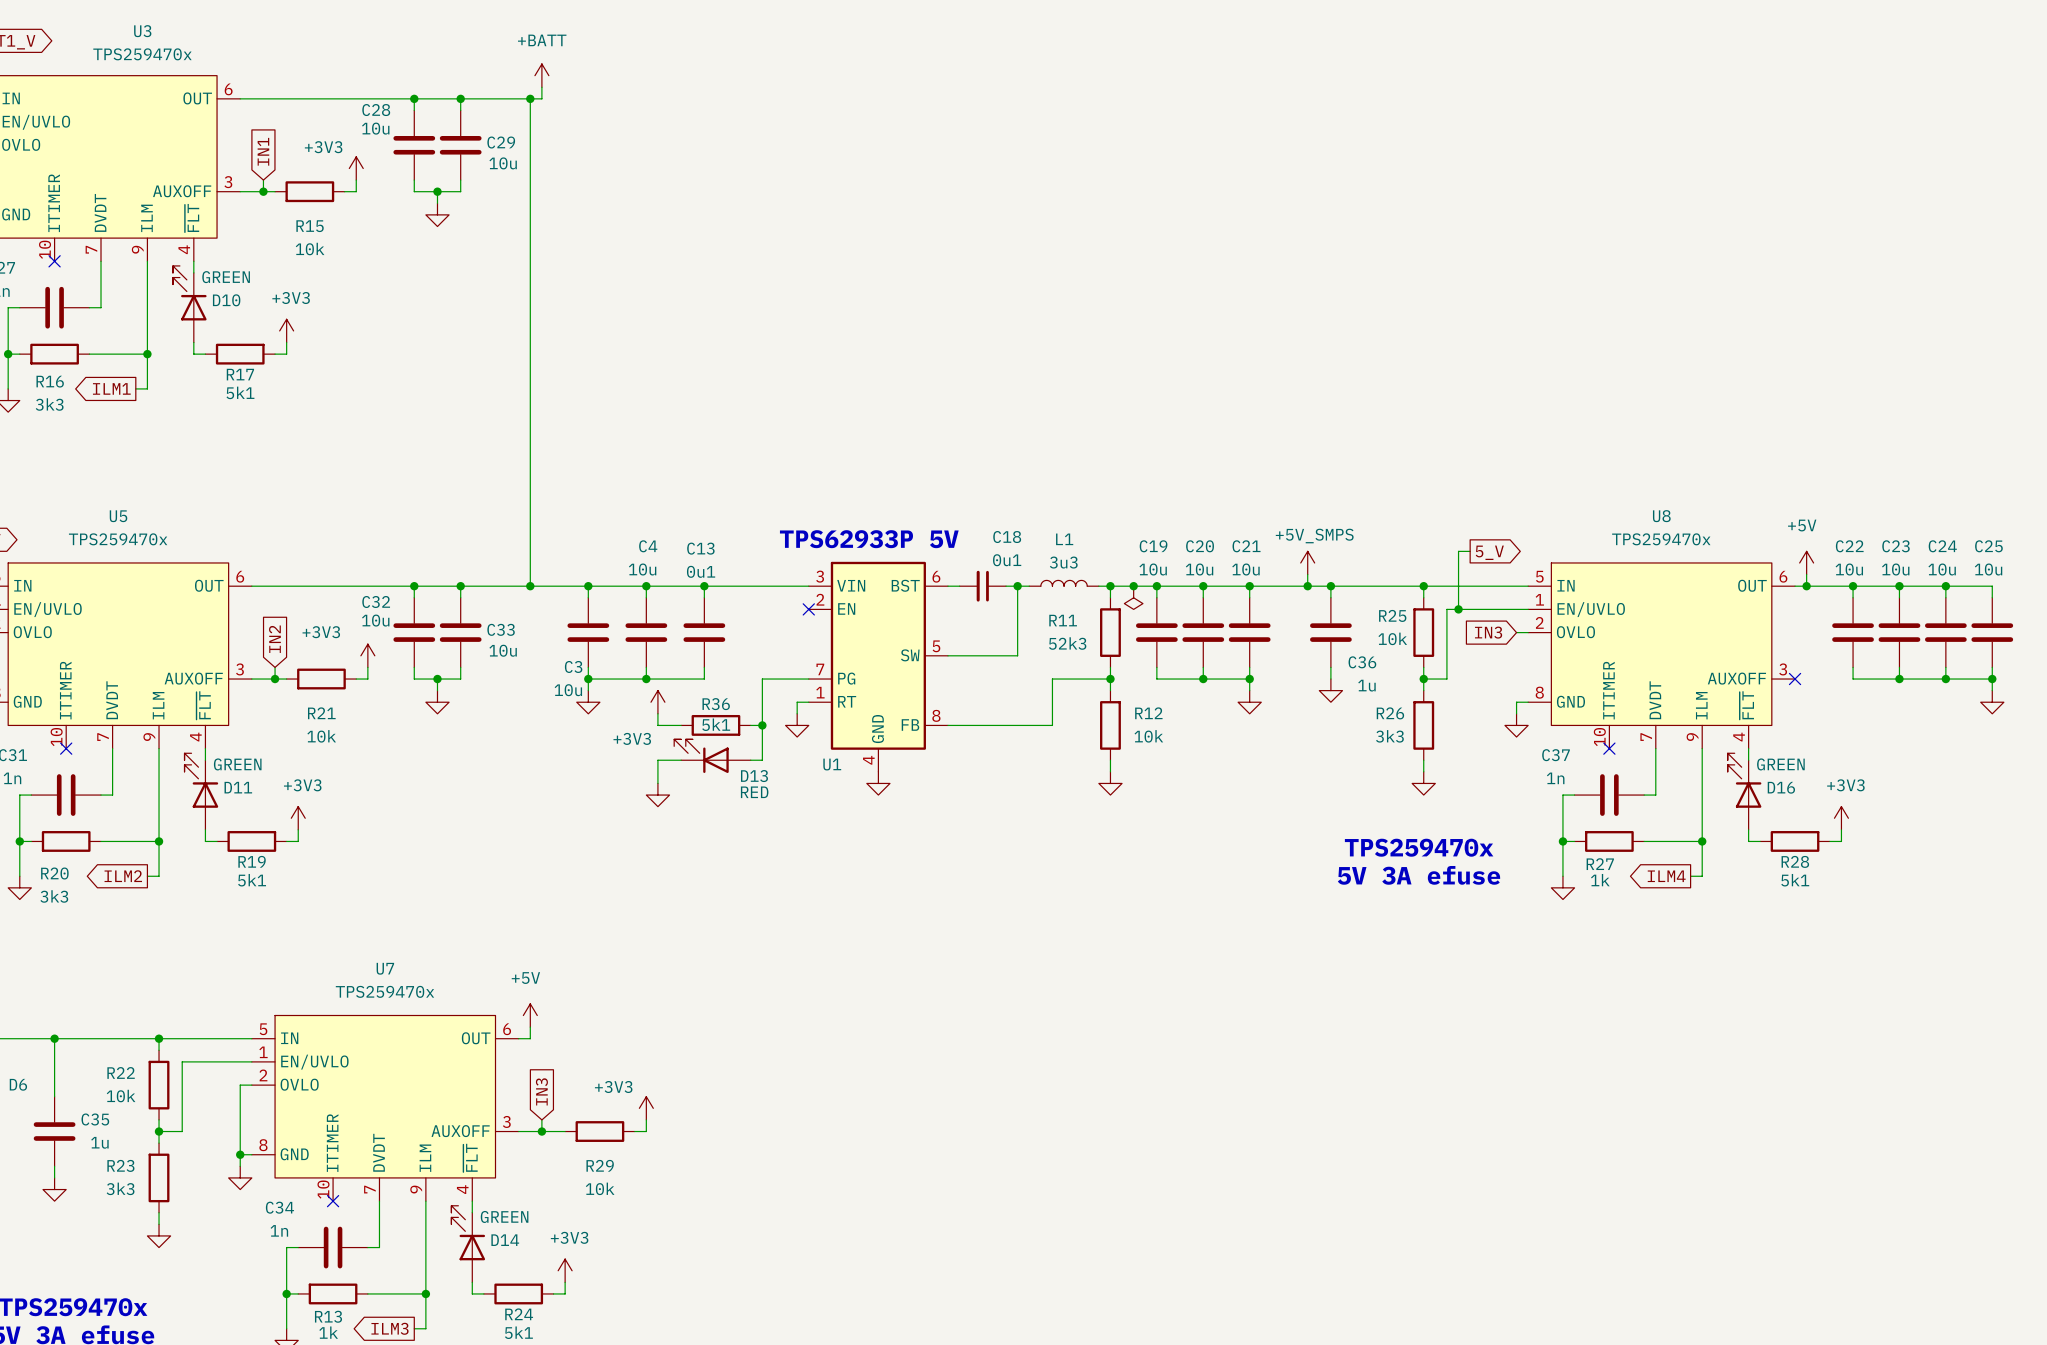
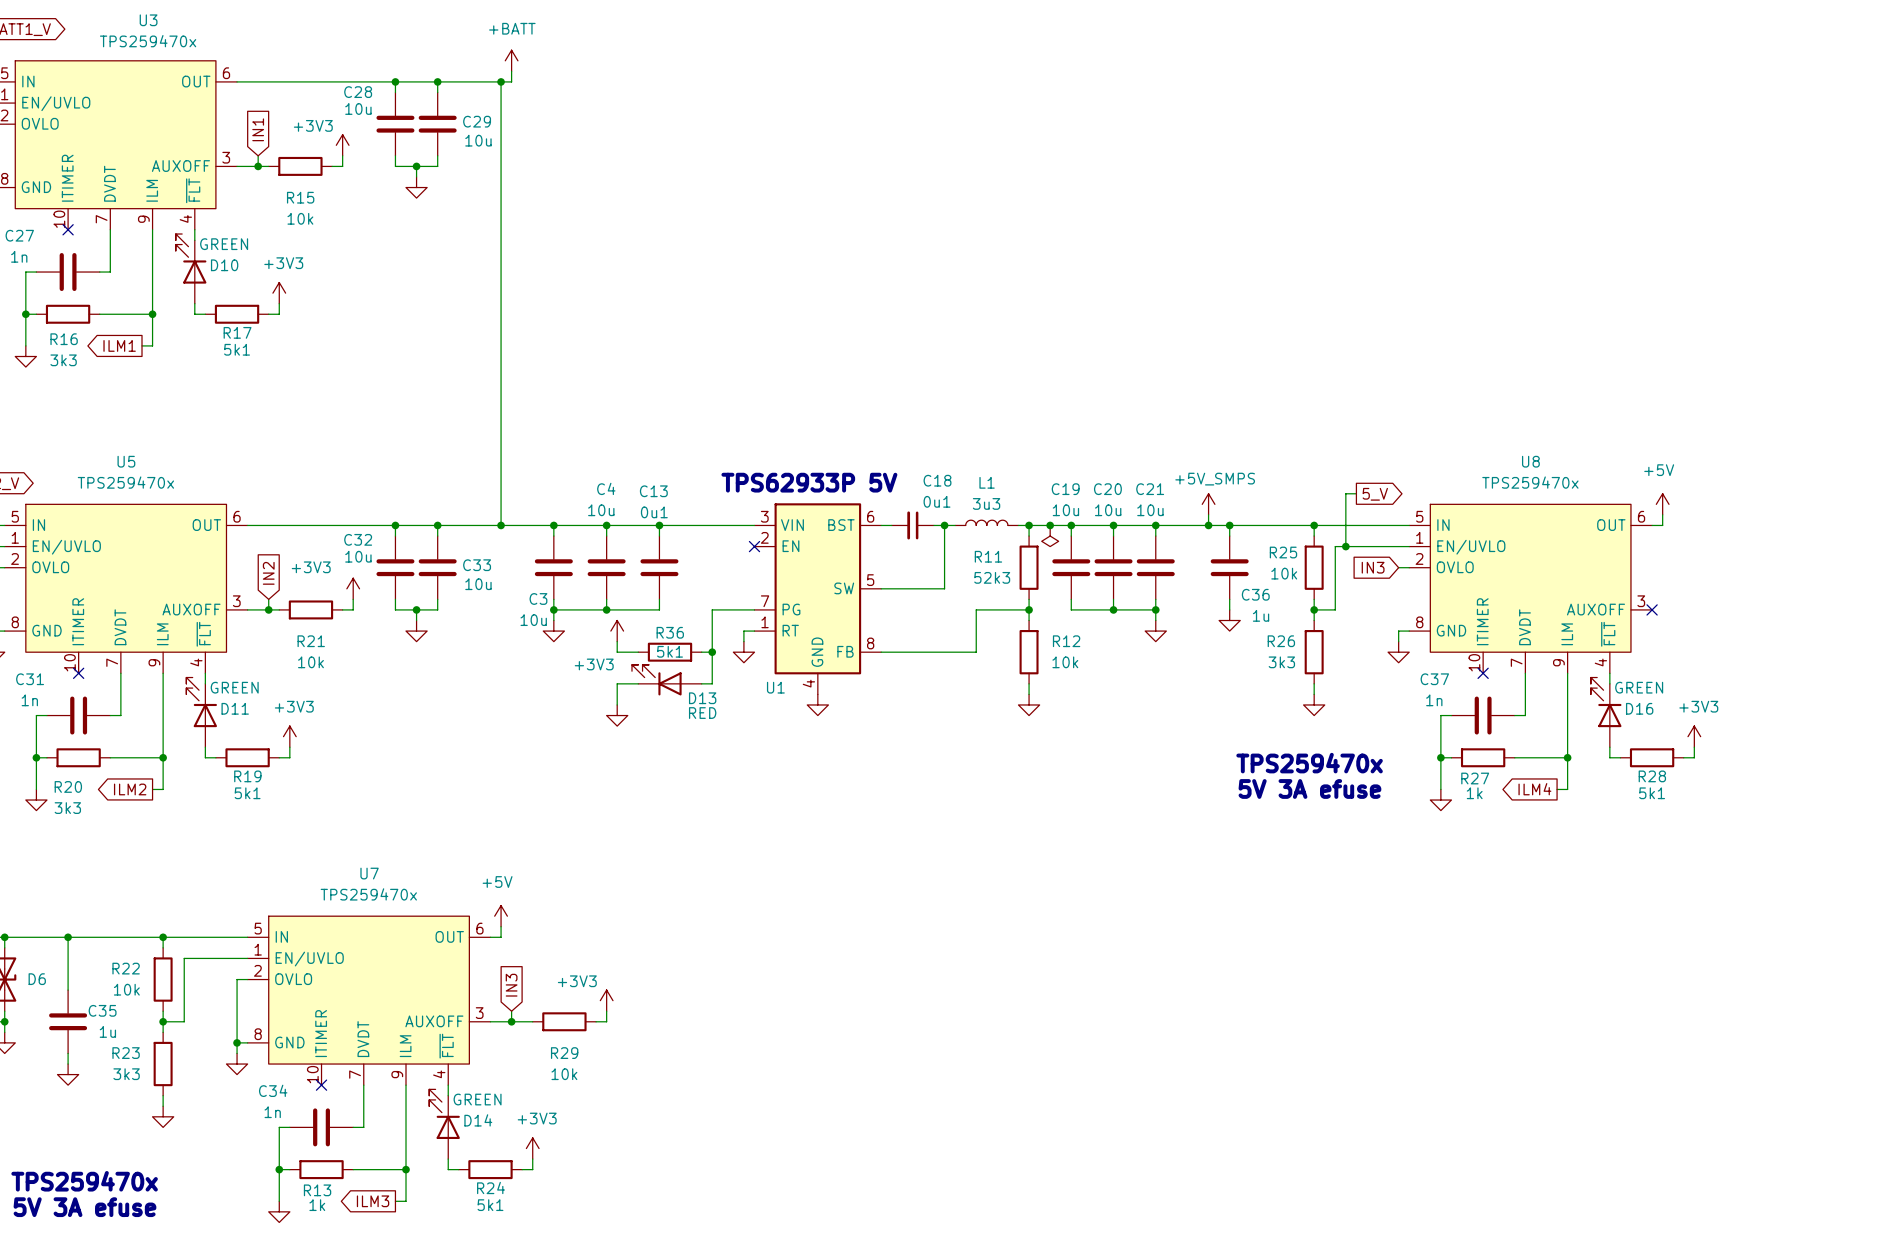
wire: (1806, 586) (1992, 586) (1992, 597) -> none
junction: (1806, 586) -> none
wire: (1853, 586) (1853, 597) -> none
junction: (1853, 586) -> none
wire: (1899, 586) (1899, 597) -> none
junction: (1899, 586) -> none
wire: (1945, 586) (1945, 597) -> none
junction: (1945, 586) -> none
C22: 10u (1853, 632) -> none
C23: 10u (1899, 632) -> none
C24: 10u (1945, 632) -> none
C25: 10u (1992, 632) -> none
wire: (1853, 667) (1853, 679) (1992, 679) -> none
wire: (1899, 667) (1899, 679) -> none
wire: (1945, 667) (1945, 679) -> none
wire: (1992, 667) (1992, 690) -> none
junction: (1899, 679) -> none
junction: (1945, 679) -> none
junction: (1992, 679) -> none
power symbol: (1992, 702) -> none

